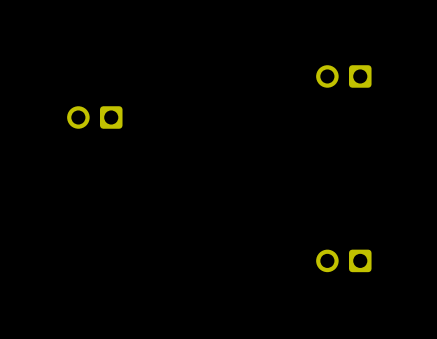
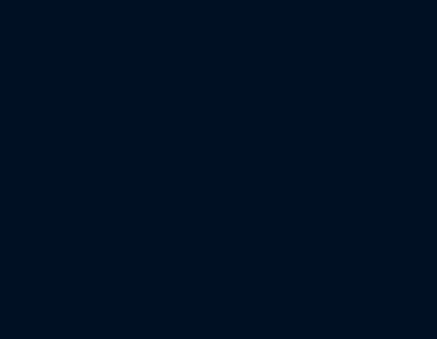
part: (343, 76) -> none
part: (94, 117) -> none
part: (343, 260) -> none

